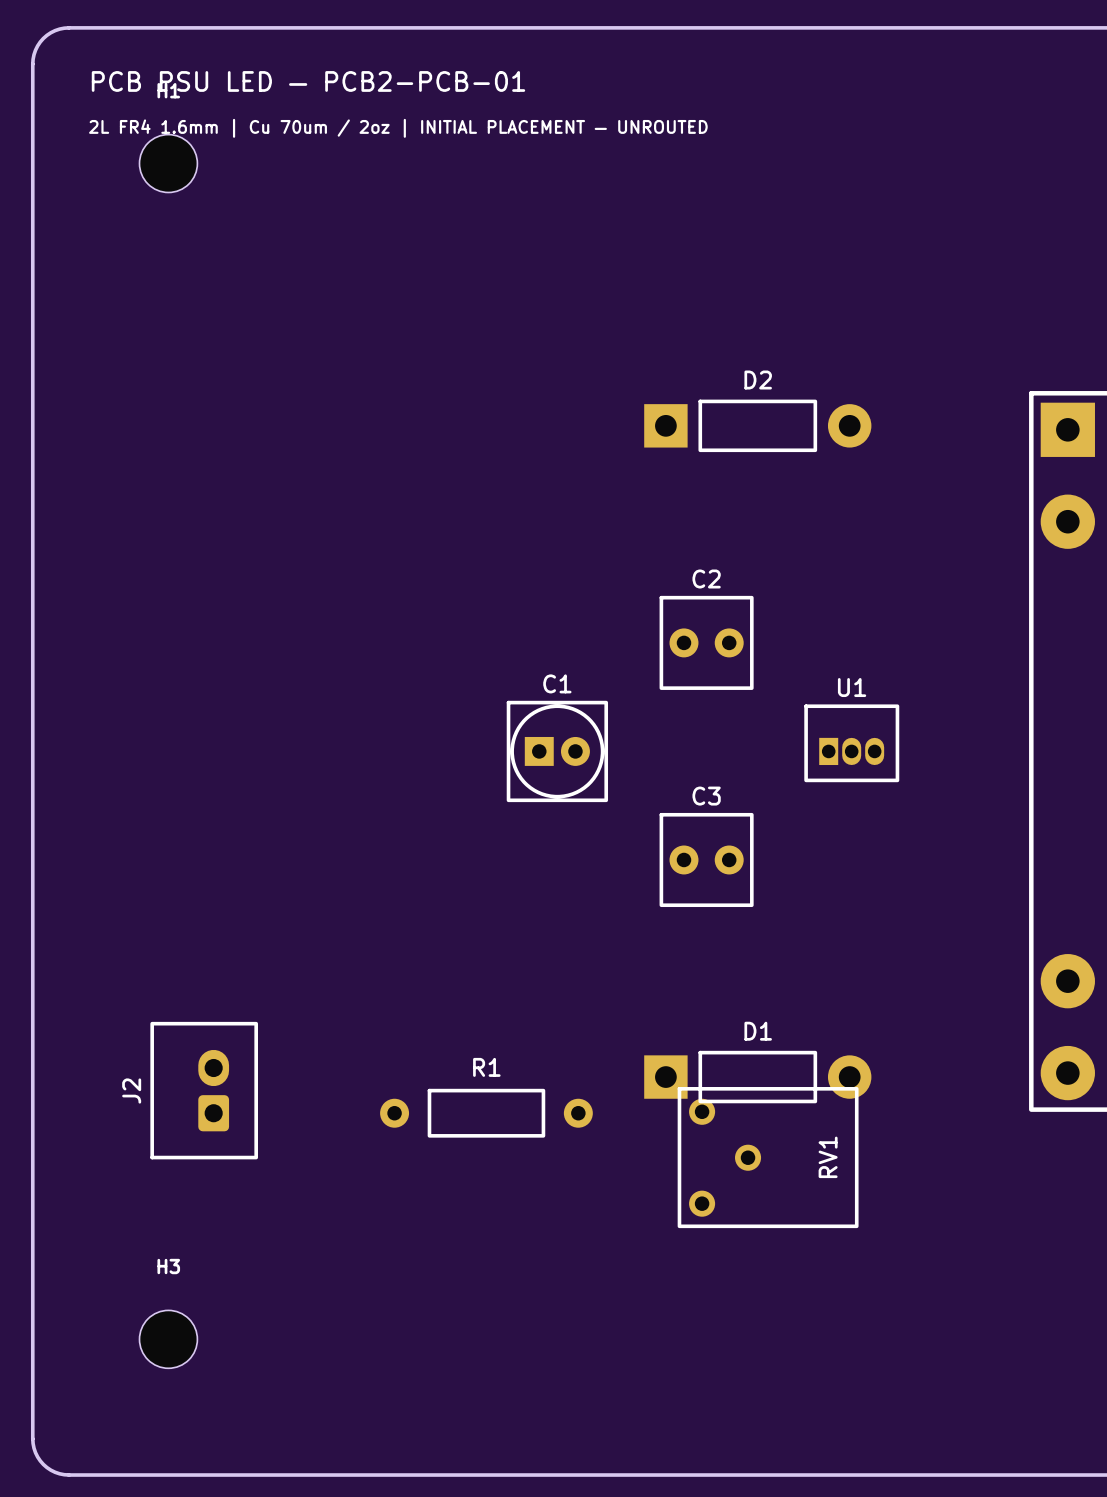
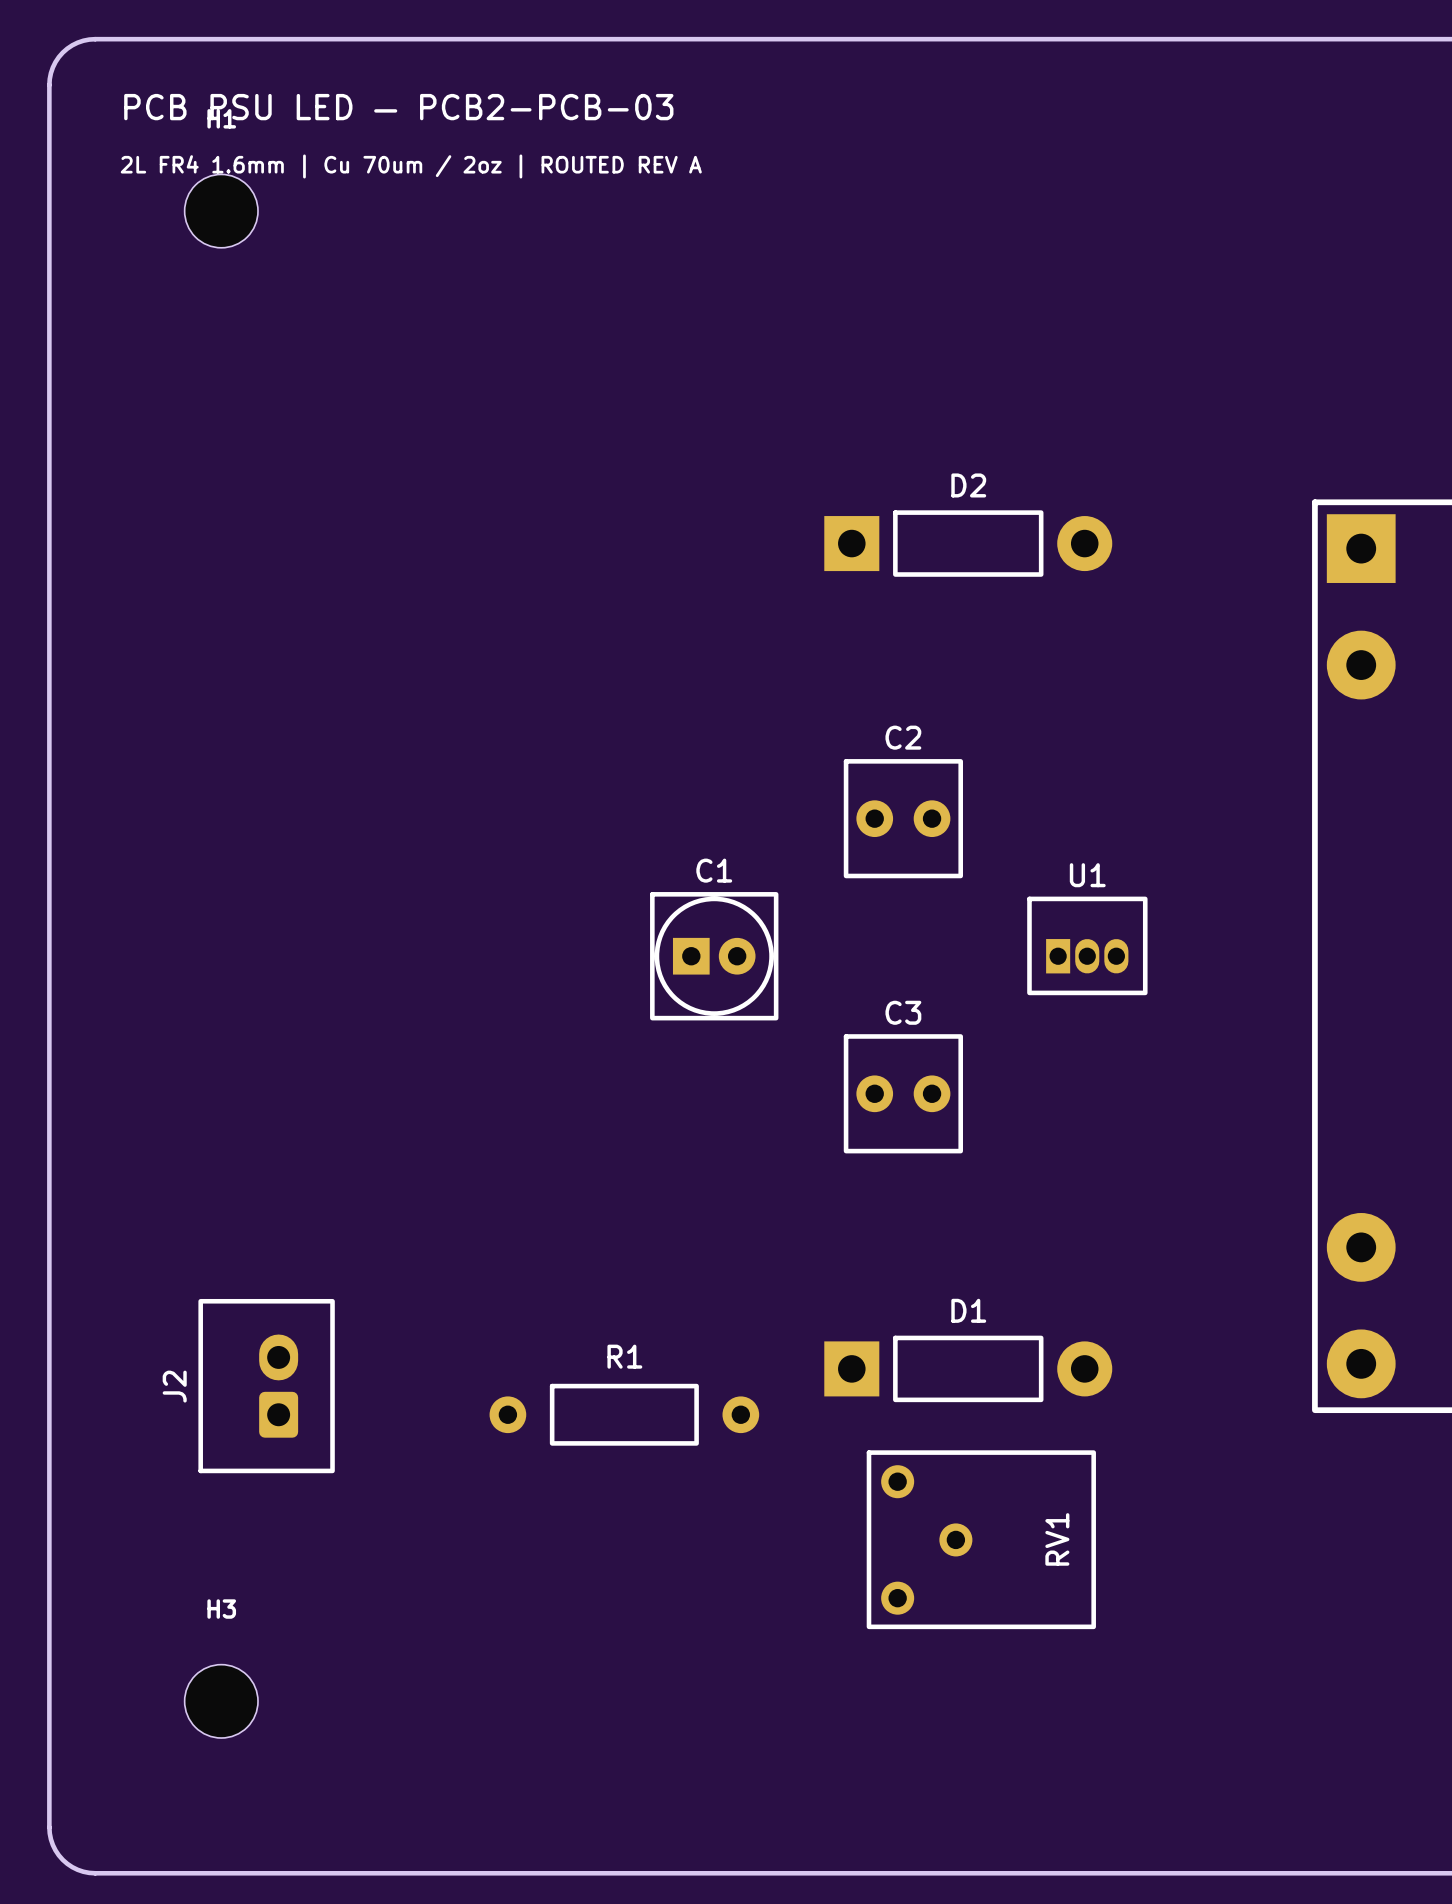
text: PCB PSU LED — PCB2-PCB-01 (308, 81) -> PCB PSU LED — PCB2-PCB-03 (398, 107)
text: 2L FR4 1.6mm | Cu 70um / 2oz | INITIAL PLACEMENT — UNROUTED (398, 128) -> 2L FR4 1.6mm | Cu 70um / 2oz | ROUTED REV A (411, 166)
RV1 position: (768, 1157) -> (981, 1539)

